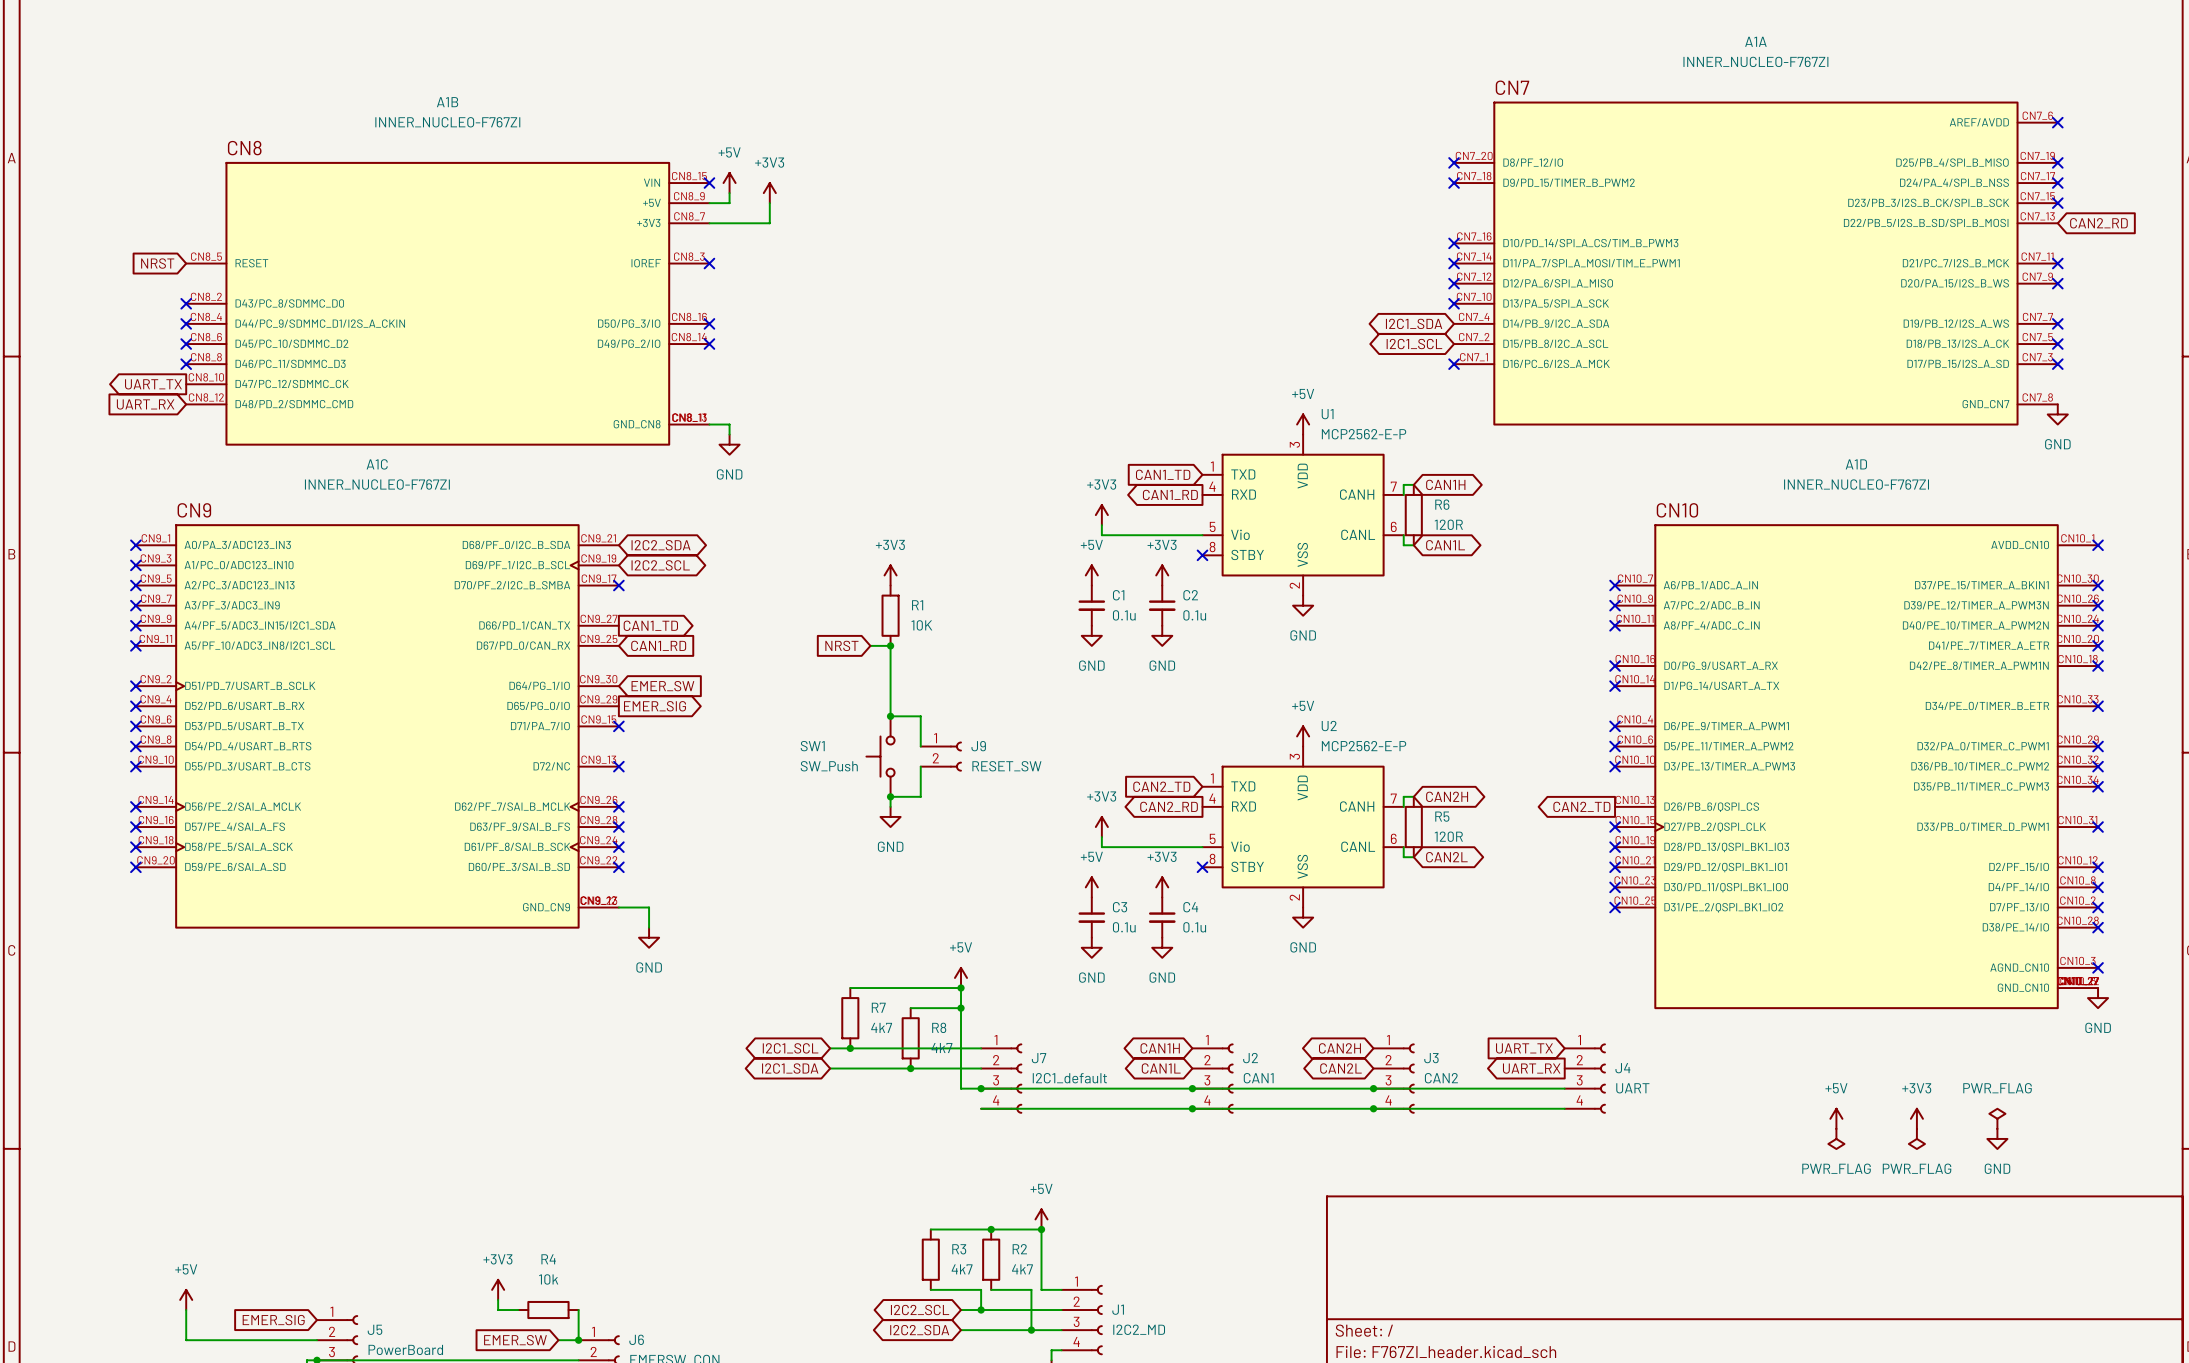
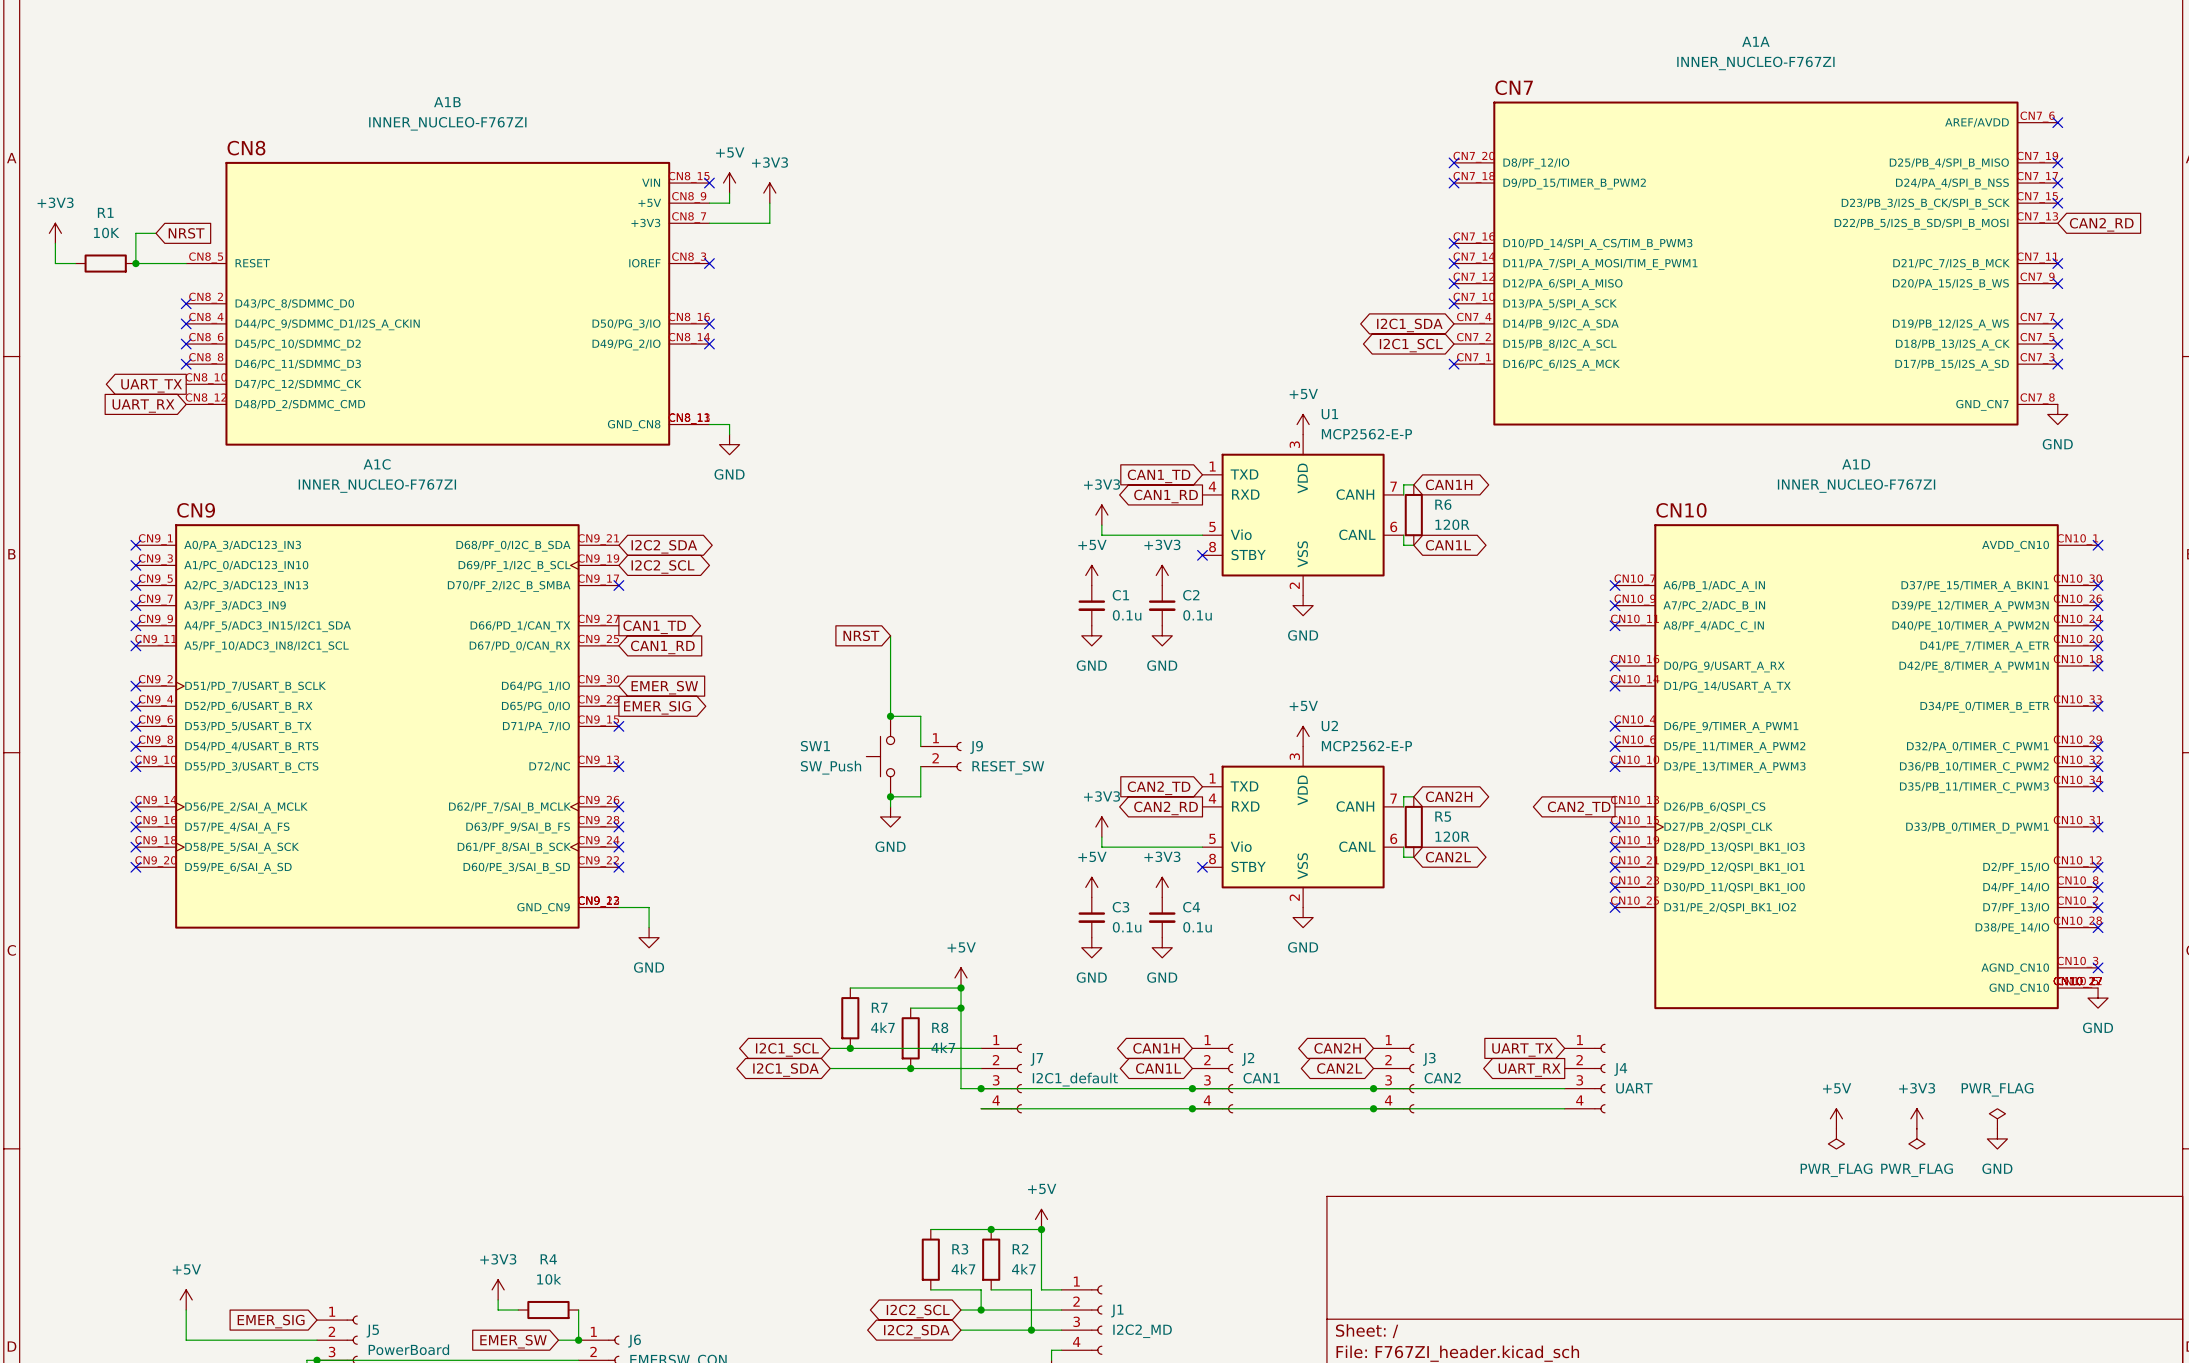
power symbol: none -> +3V3 (55, 233)
wire: none -> (156, 233) (135, 233) (135, 263) (186, 263)
wire: none -> (55, 243) (55, 263) (75, 263)
junction: none -> (135, 263)
global label rotation: 0° (157, 263) -> 180° (186, 233)
power symbol: +3V3 (890, 575) -> none
R1 name position: R1 (917, 605) -> R1 (105, 212)
R1 rotation: 0° (890, 615) -> 90° clockwise (105, 263)
R1 position: (890, 615) -> (105, 263)
R1 value position: 10K (921, 625) -> 10K (106, 232)
global label position: NRST (841, 645) -> NRST (861, 635)
junction: (890, 645) -> none

